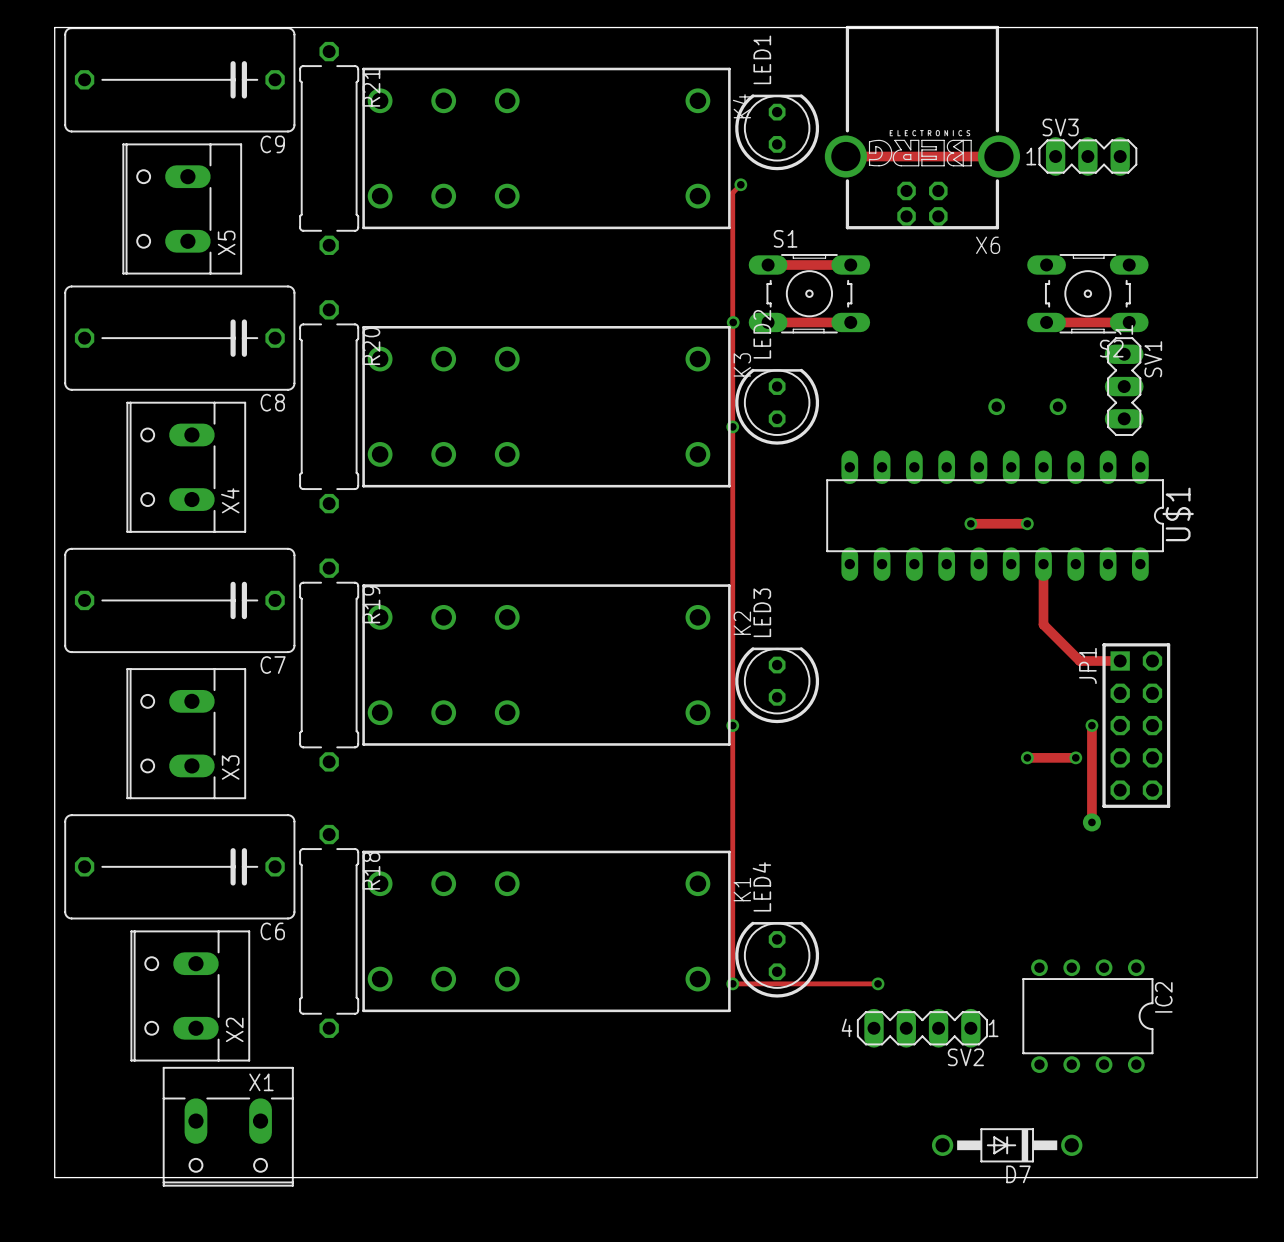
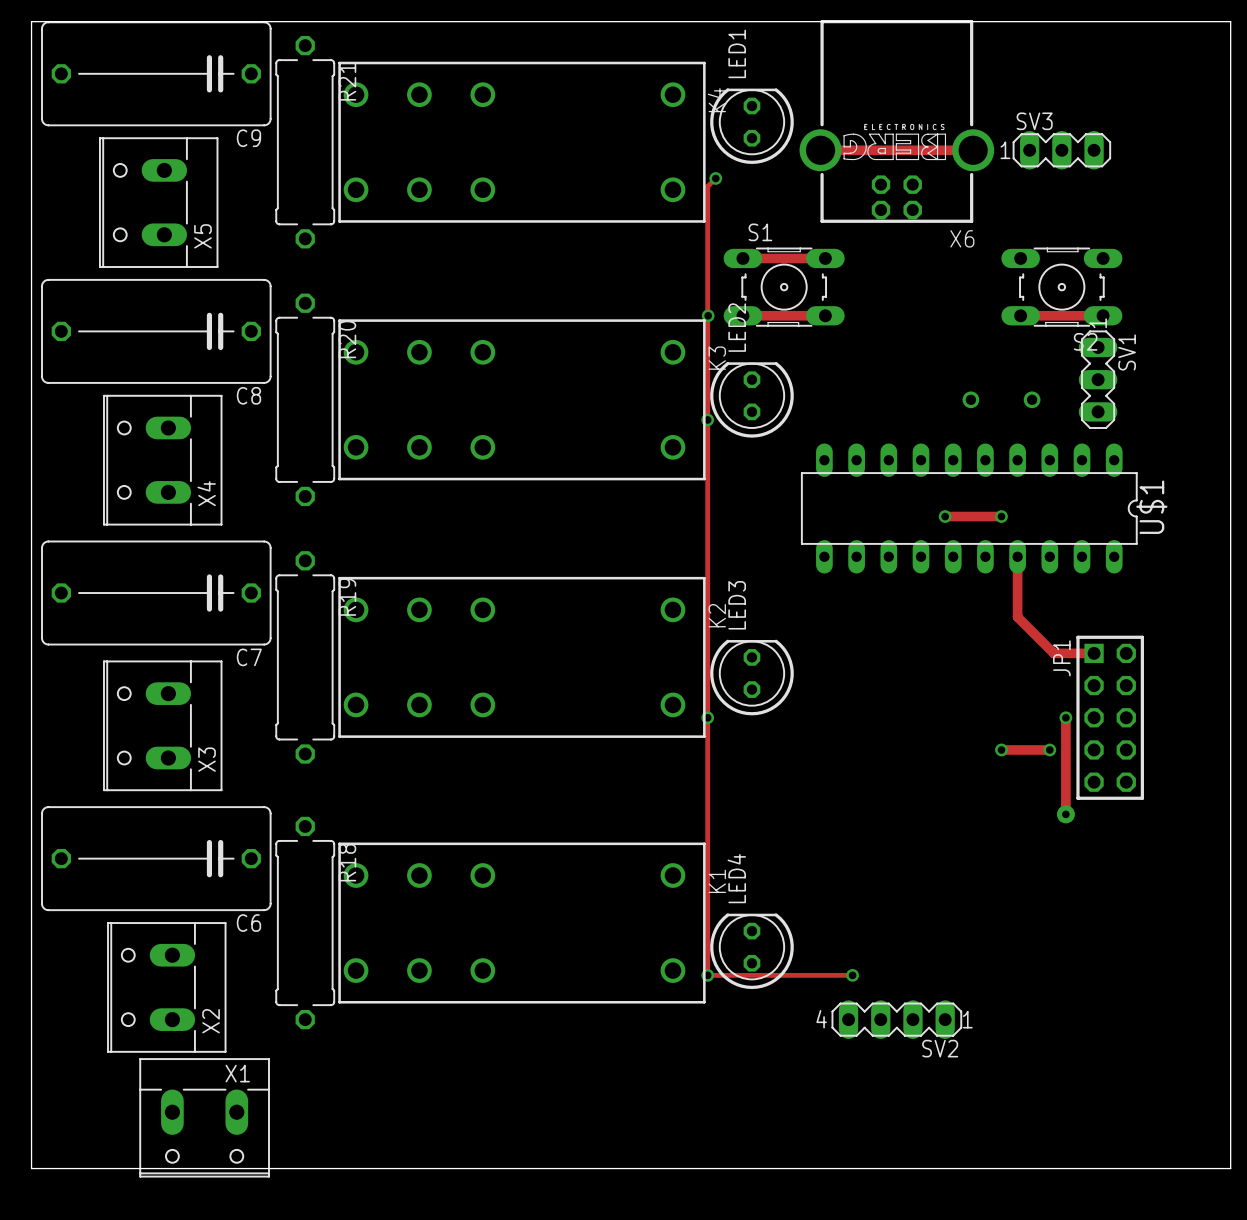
IC2: (1087, 1016) -> none
D7: (1007, 1145) -> none

